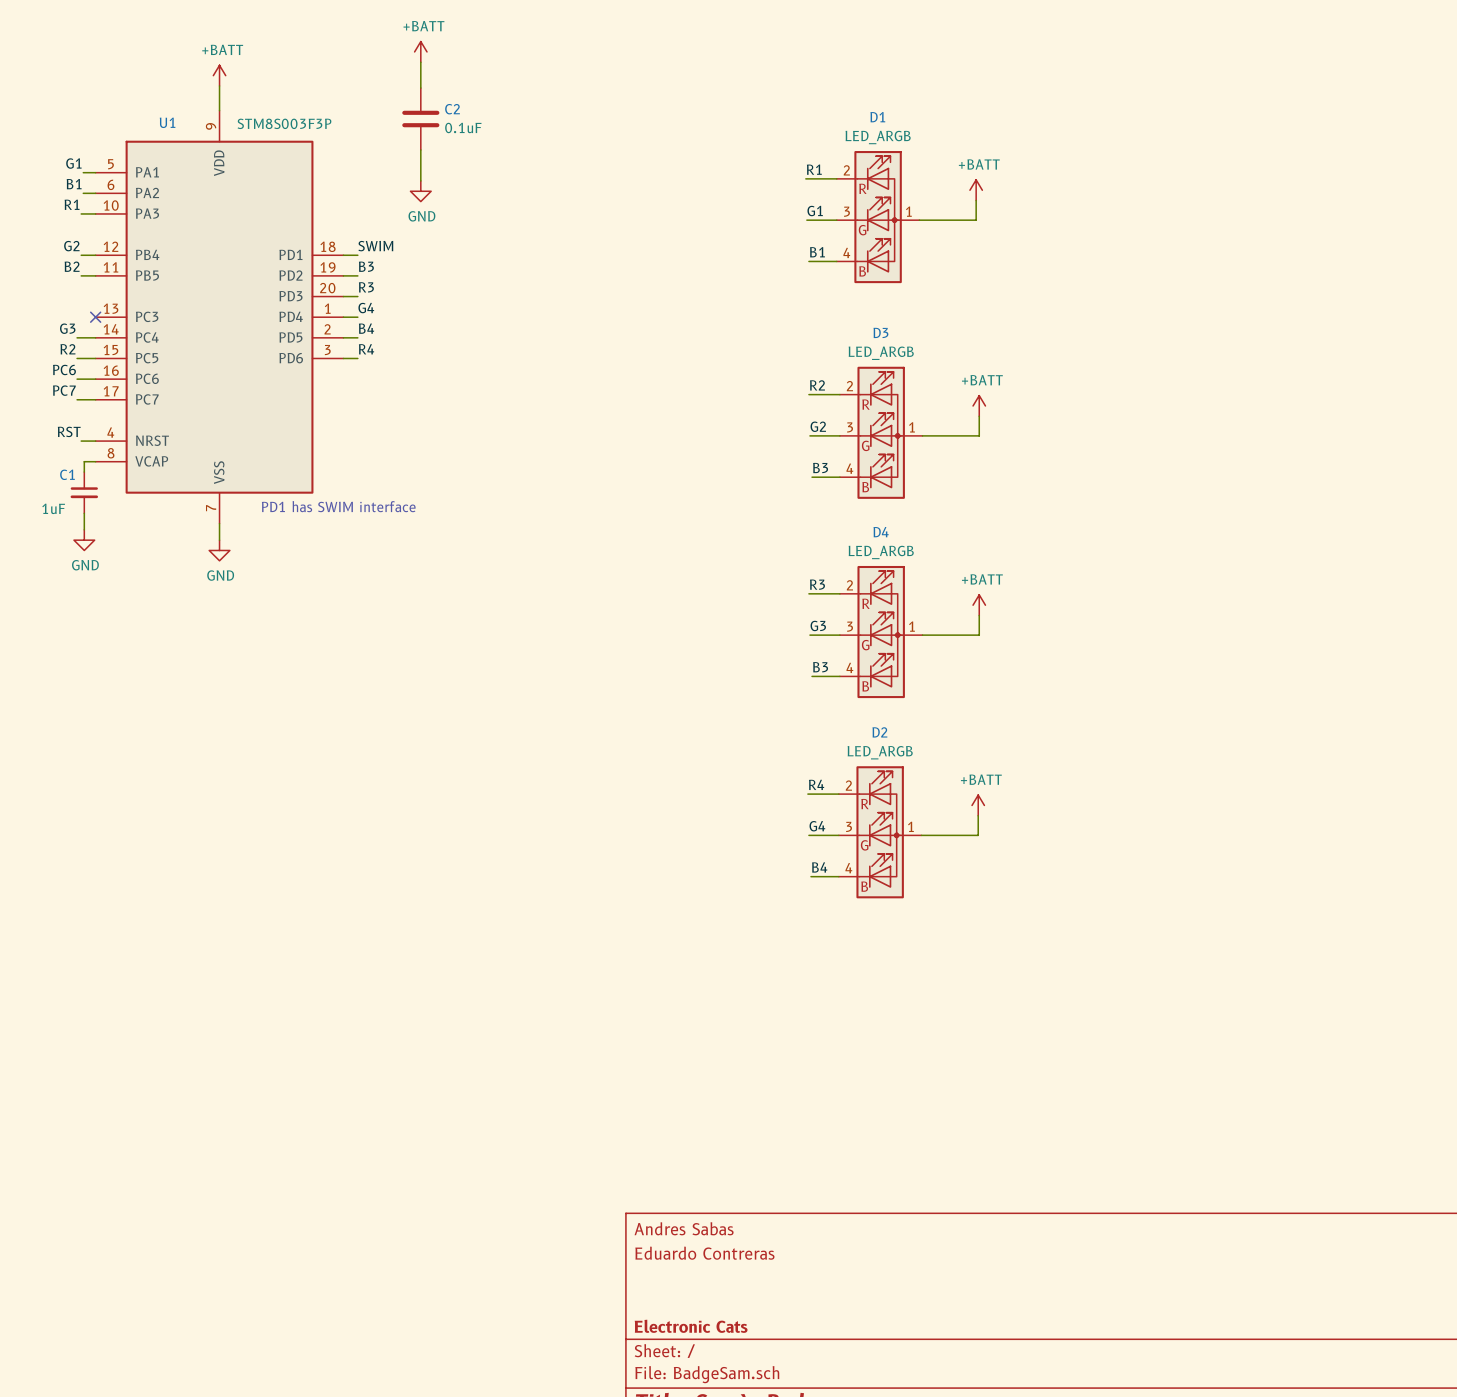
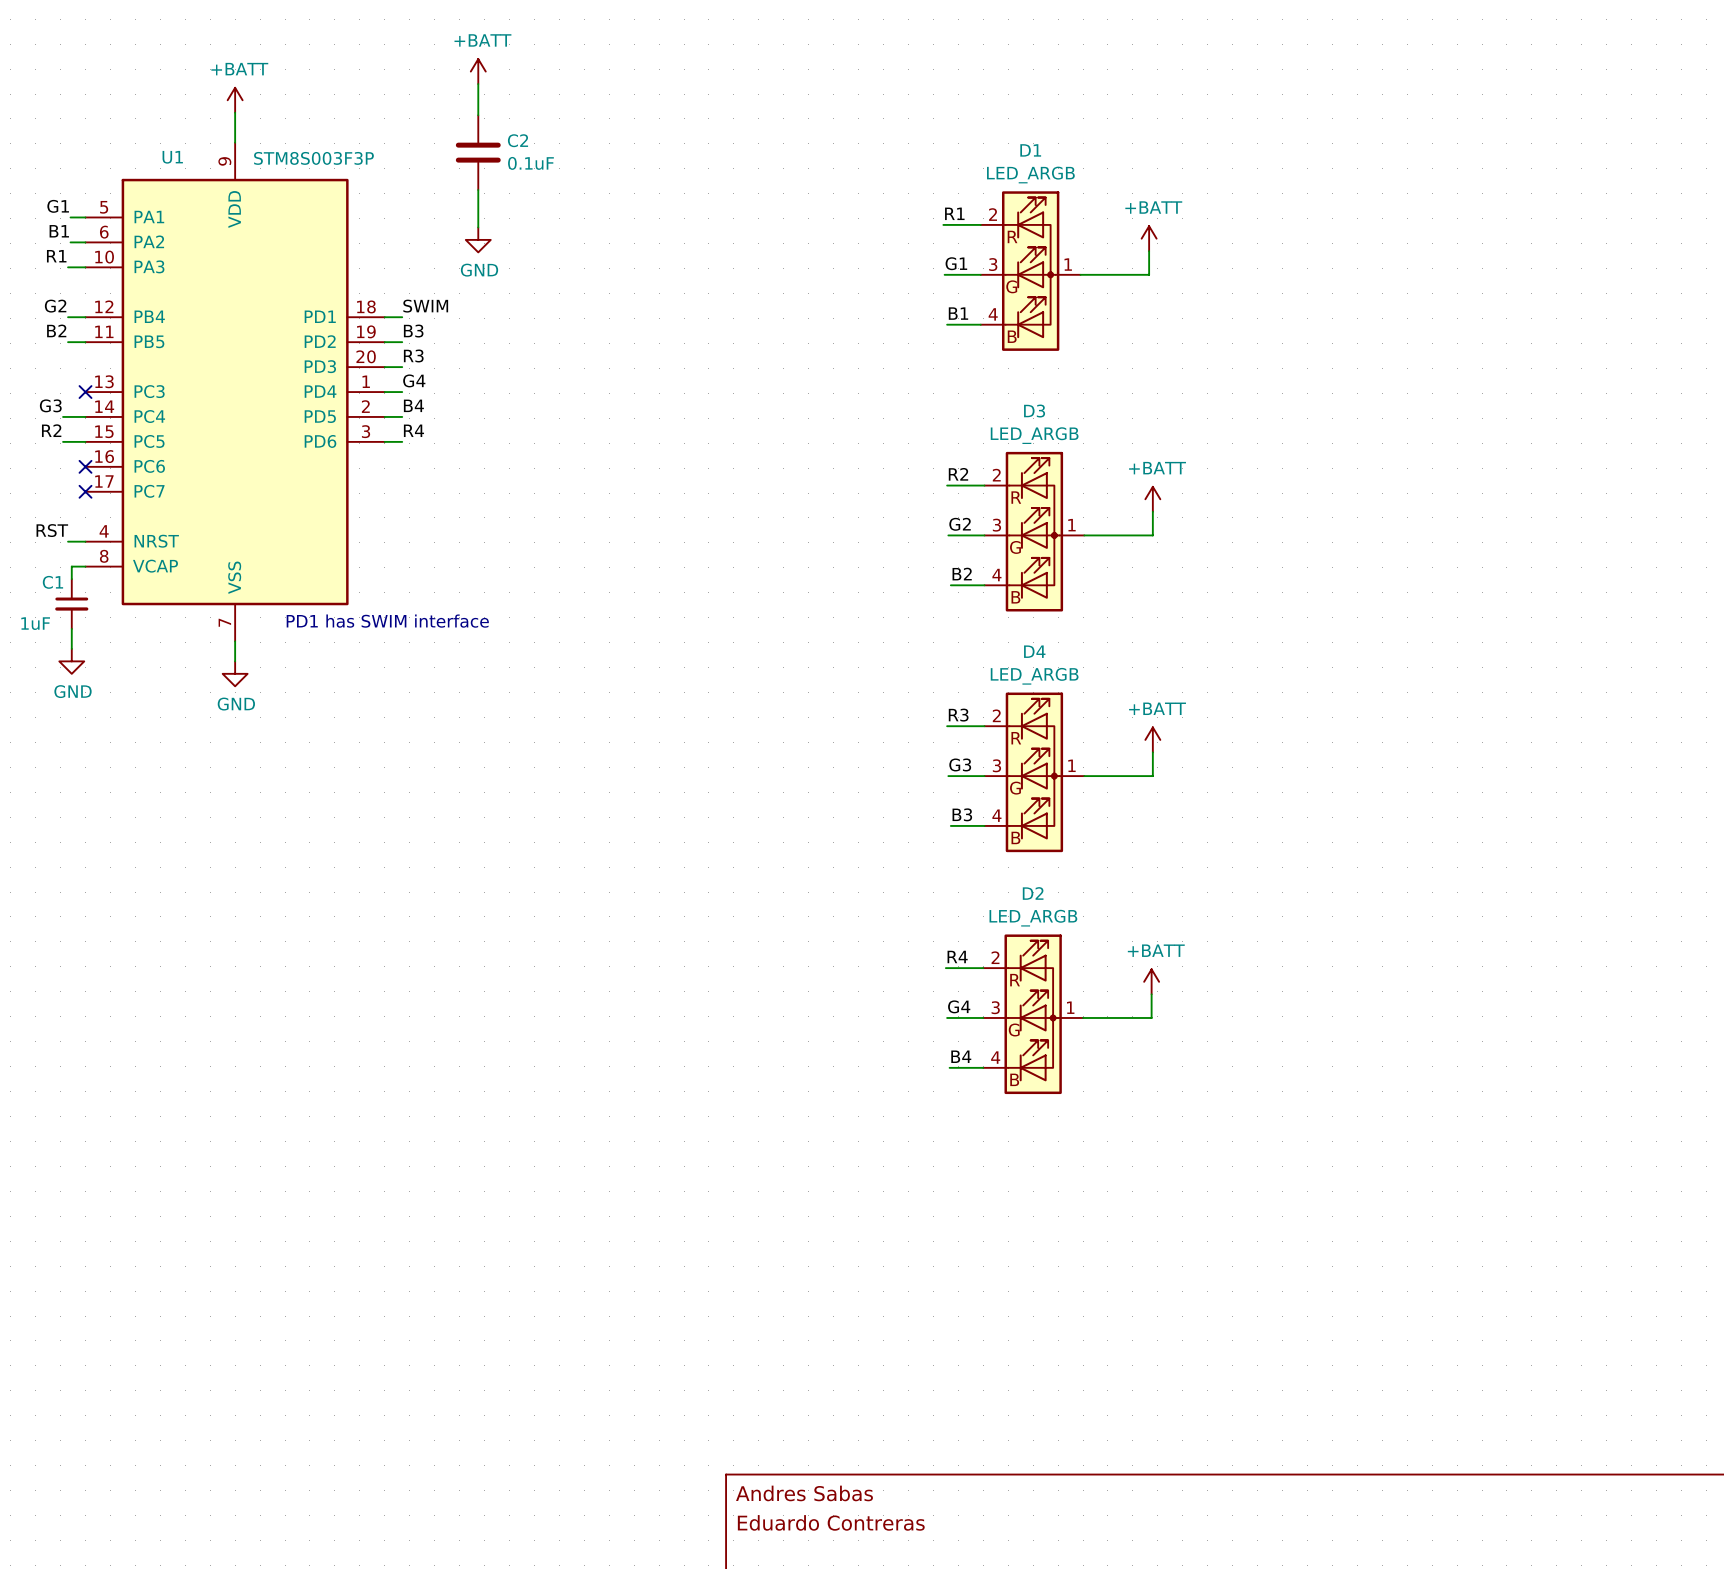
label: PC6 (64, 369) -> none
wire: (77, 379) (95, 379) -> none
no-connect mark: none -> (85, 466)
label: PC7 (64, 390) -> none
wire: (77, 399) (95, 399) -> none
no-connect mark: none -> (85, 491)
label: B3 (820, 468) -> B2 (962, 574)

